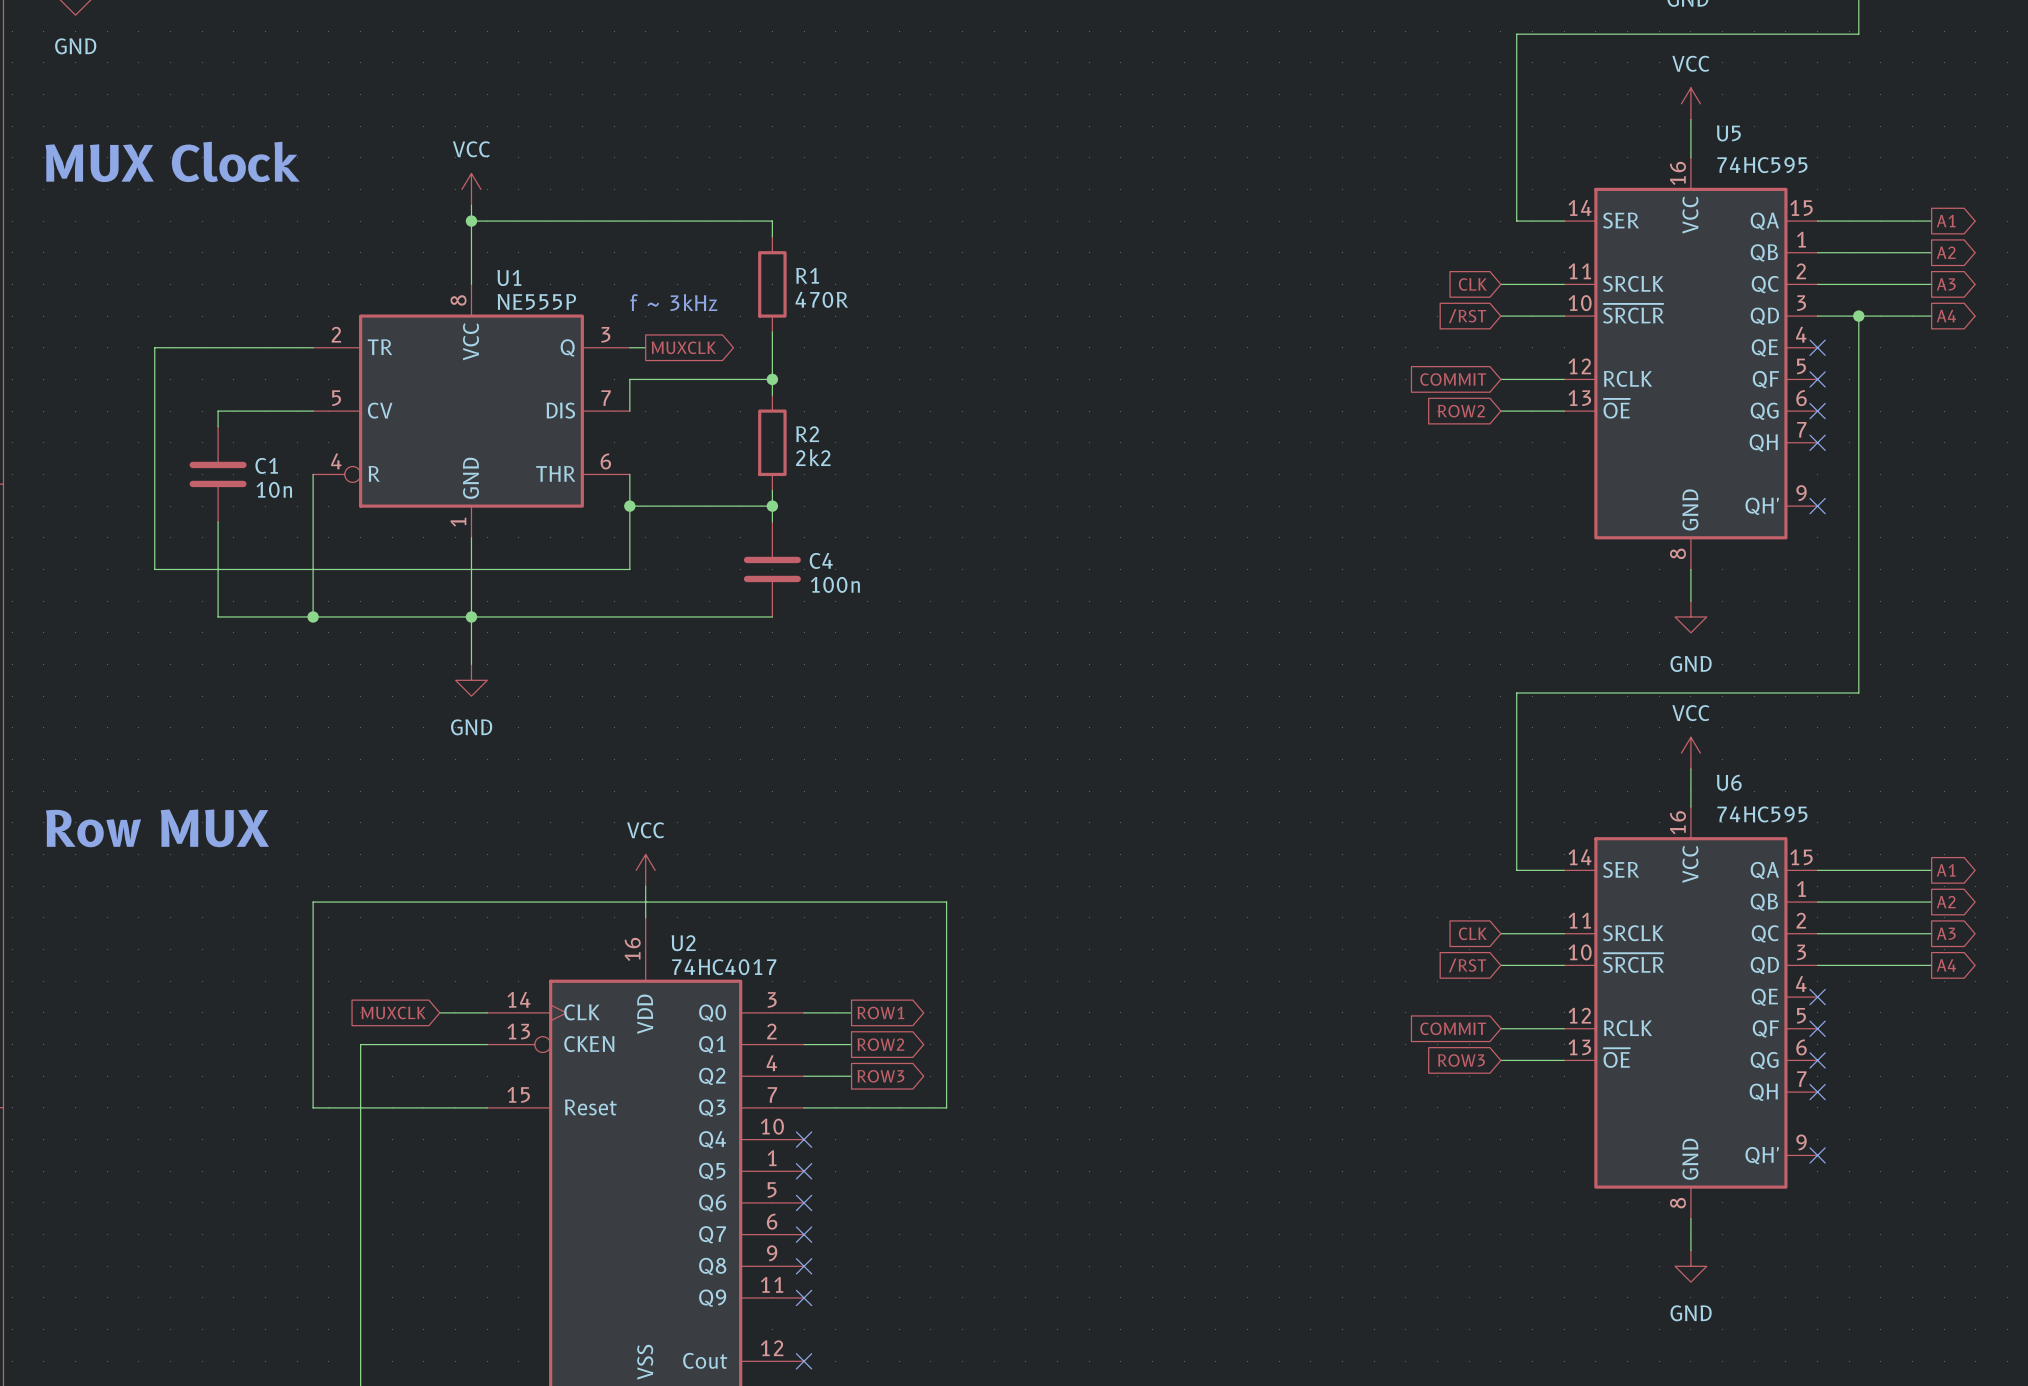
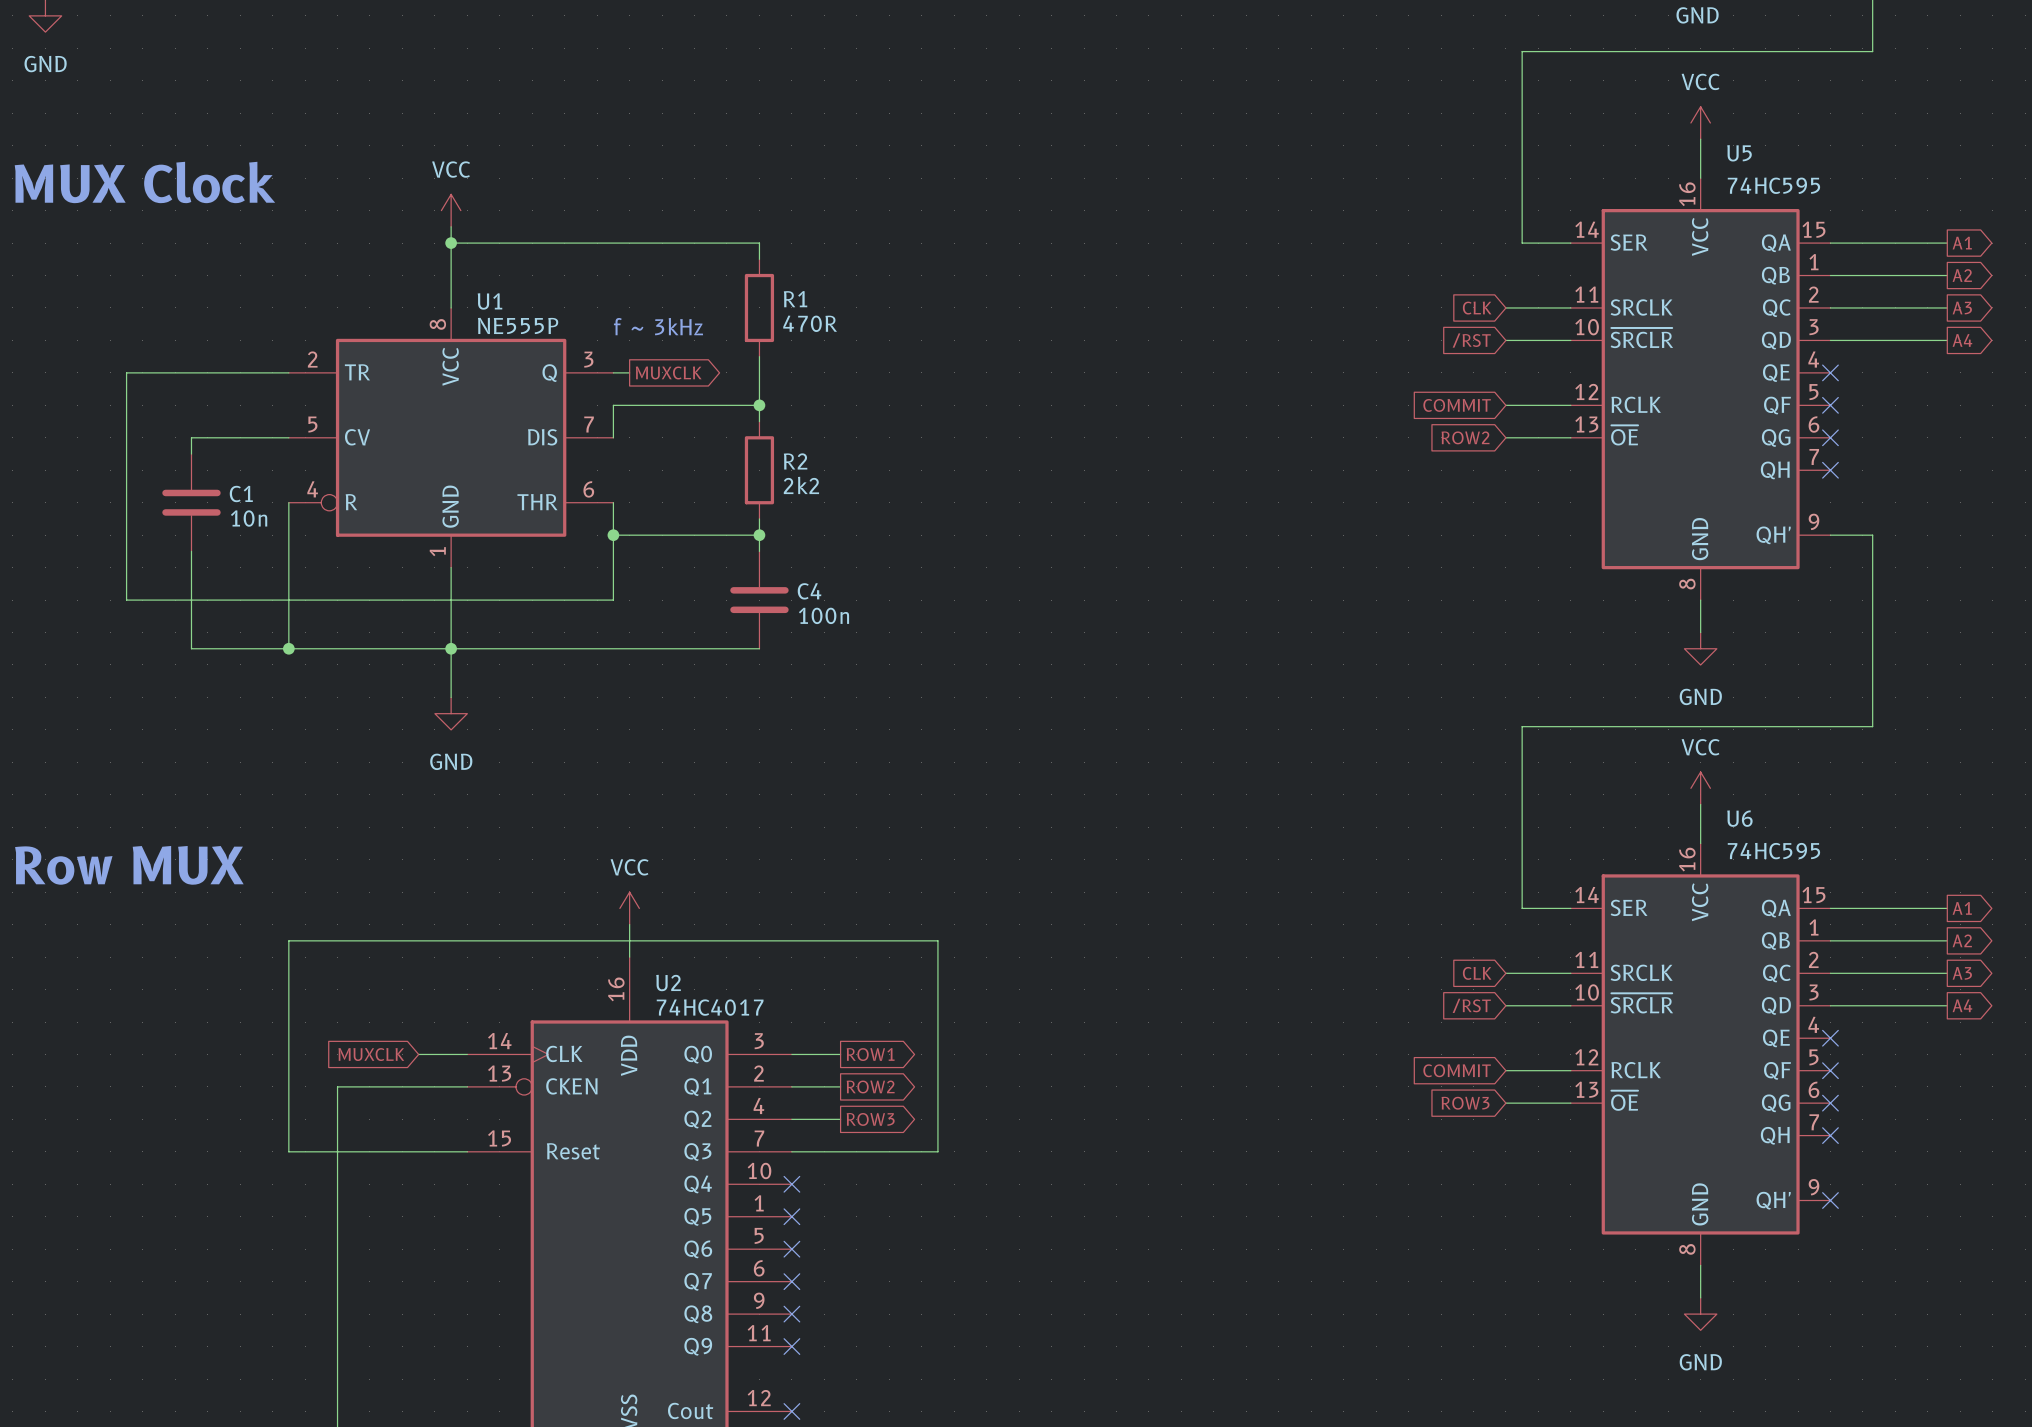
wire: (1858, 316) (1858, 506) -> (1830, 535) (1872, 535)
junction: (1858, 316) -> none
no-connect mark: (1817, 506) -> none

